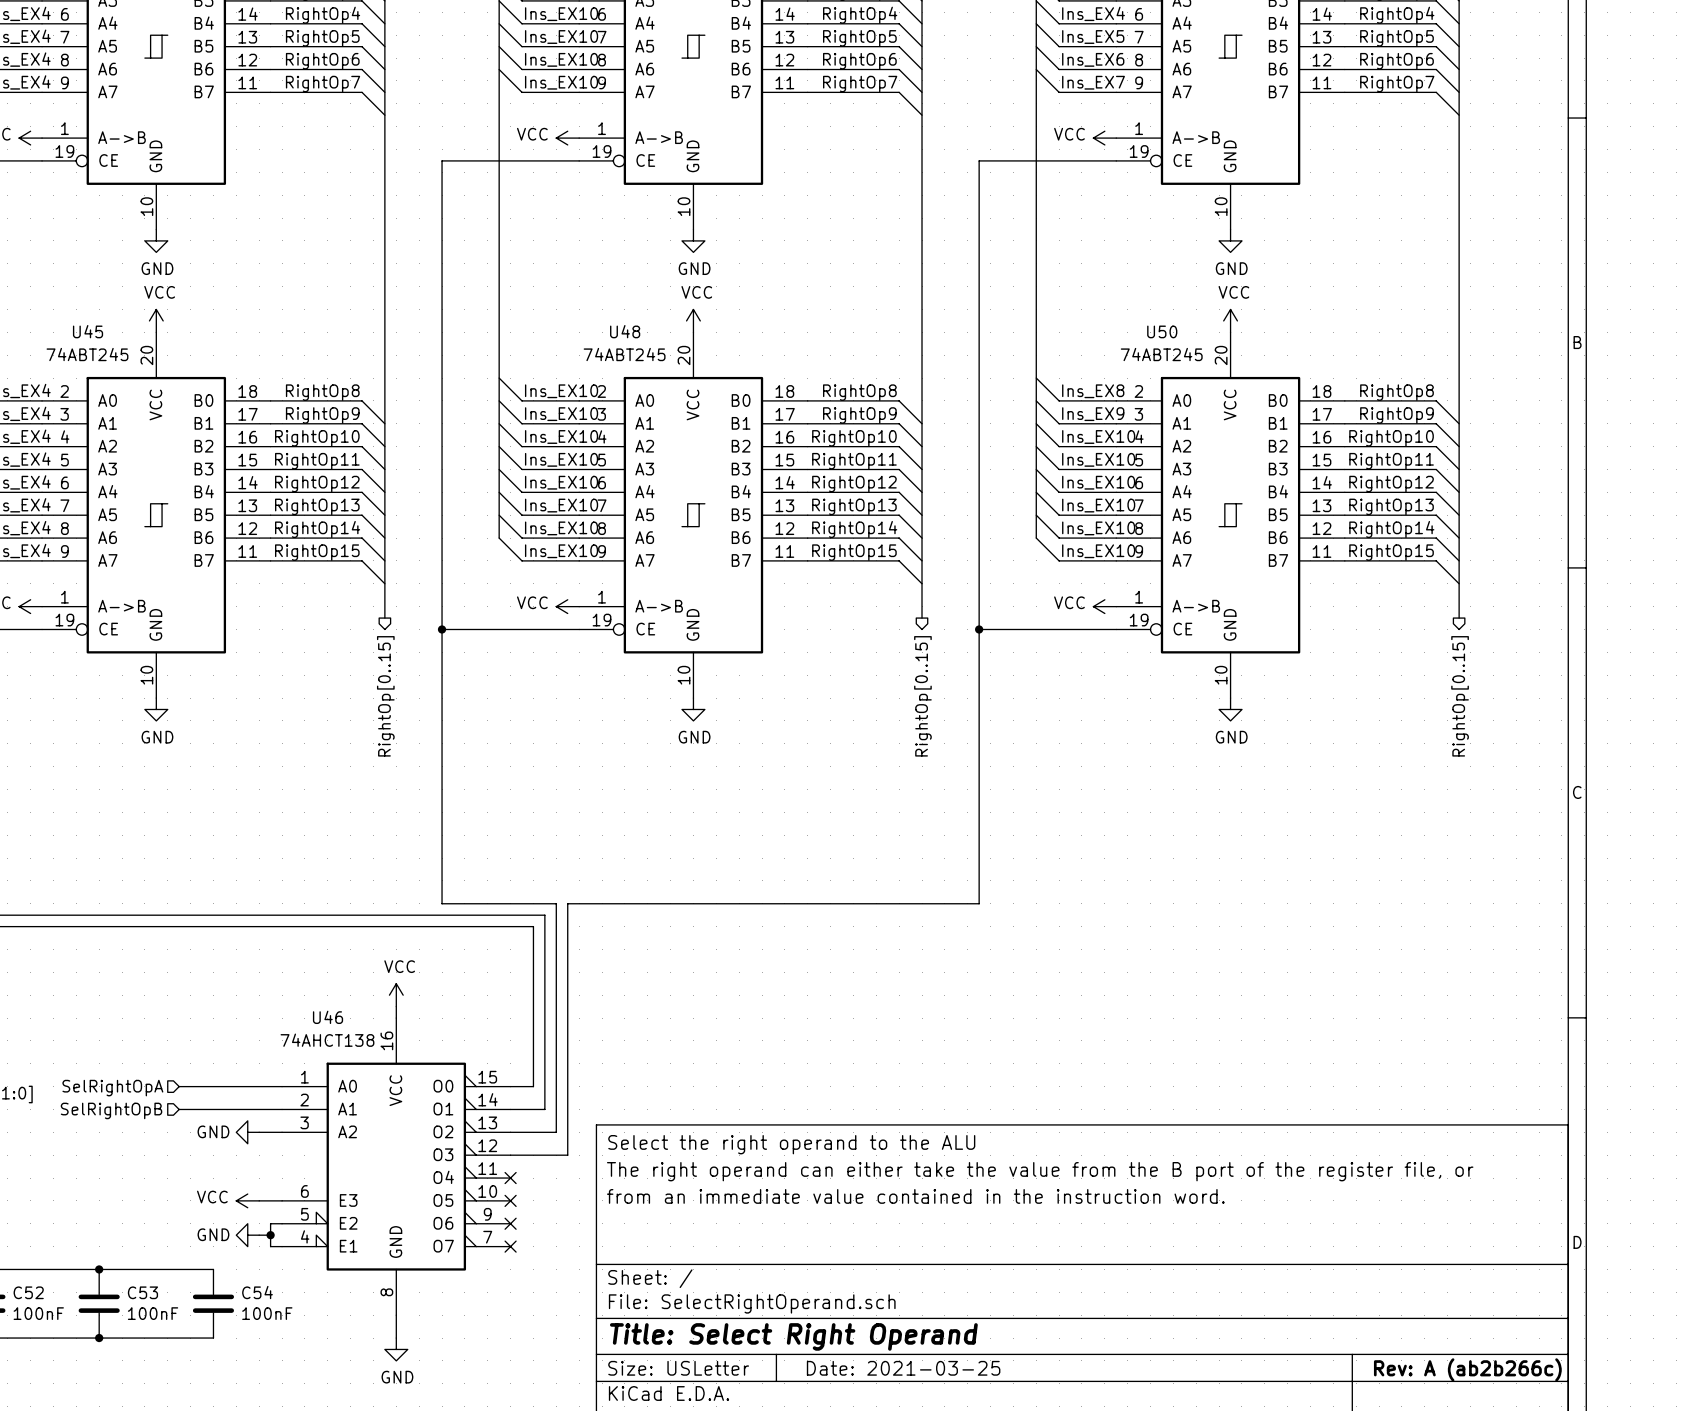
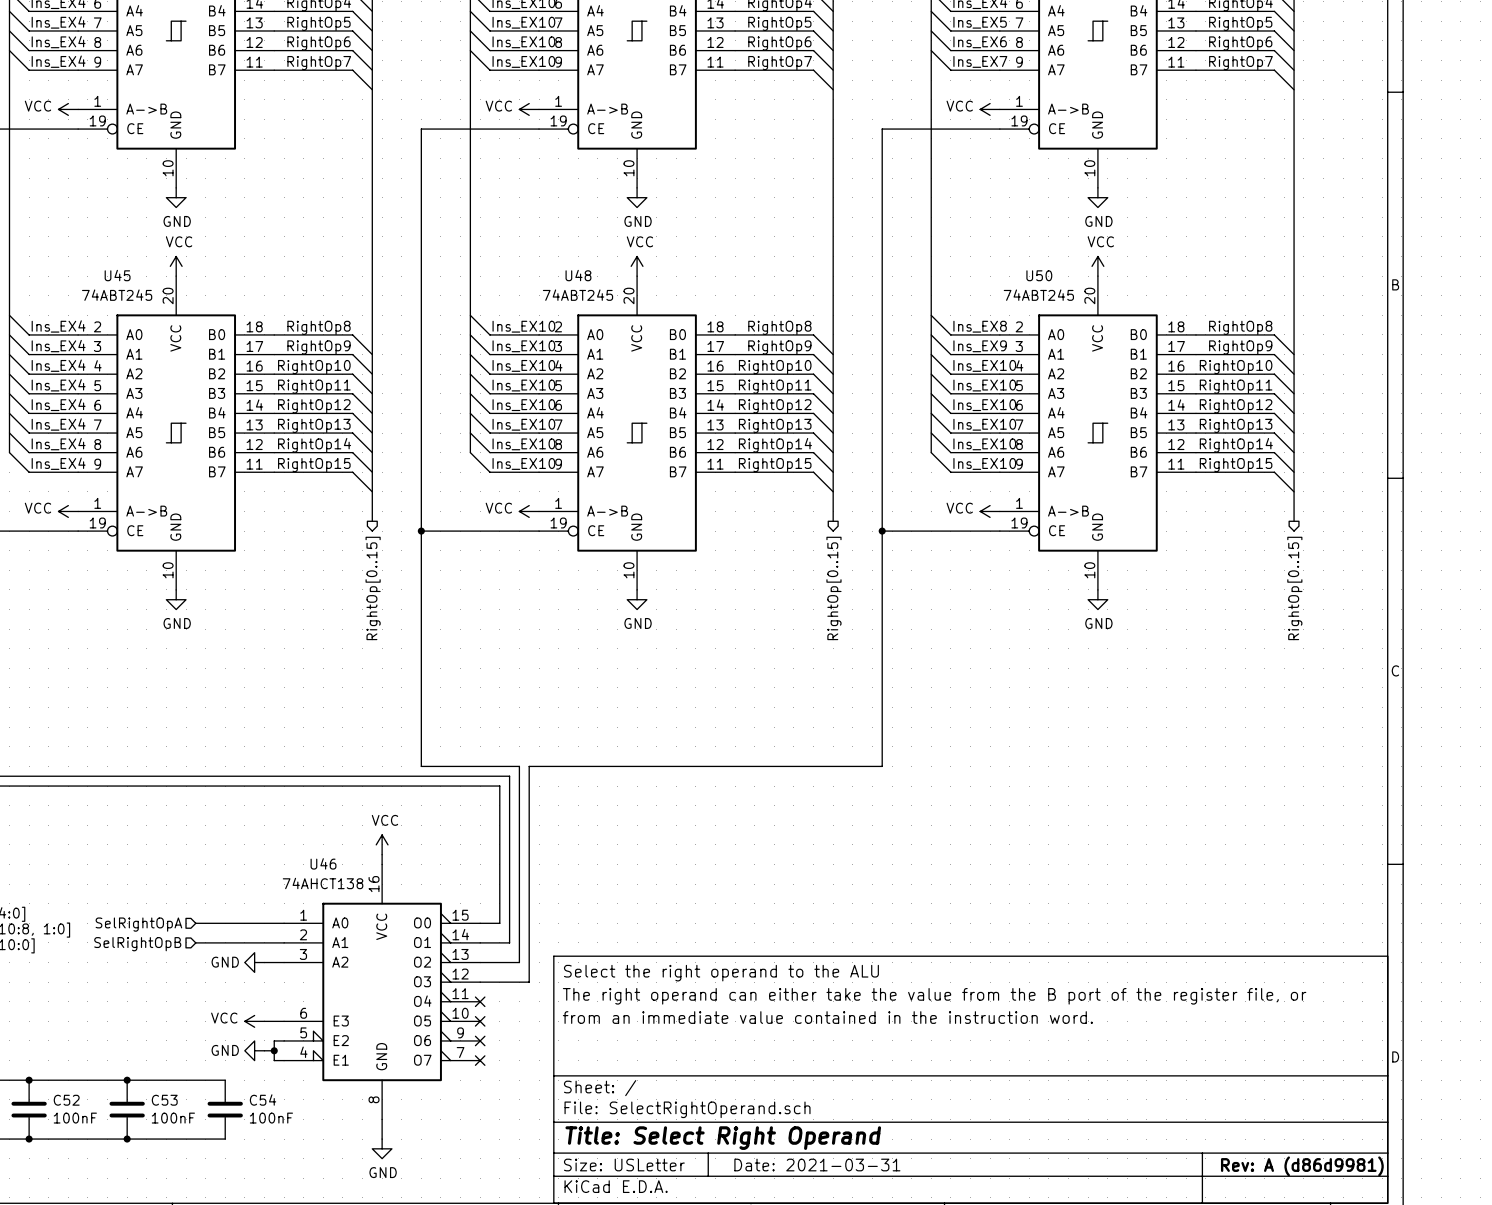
title block: Date: 2021-03-25 (903, 1368) -> Date: 2021-03-31 (817, 1165)
title block: Rev: A (ab2b266c) (1467, 1369) -> Rev: A (d86d9981) (1302, 1166)

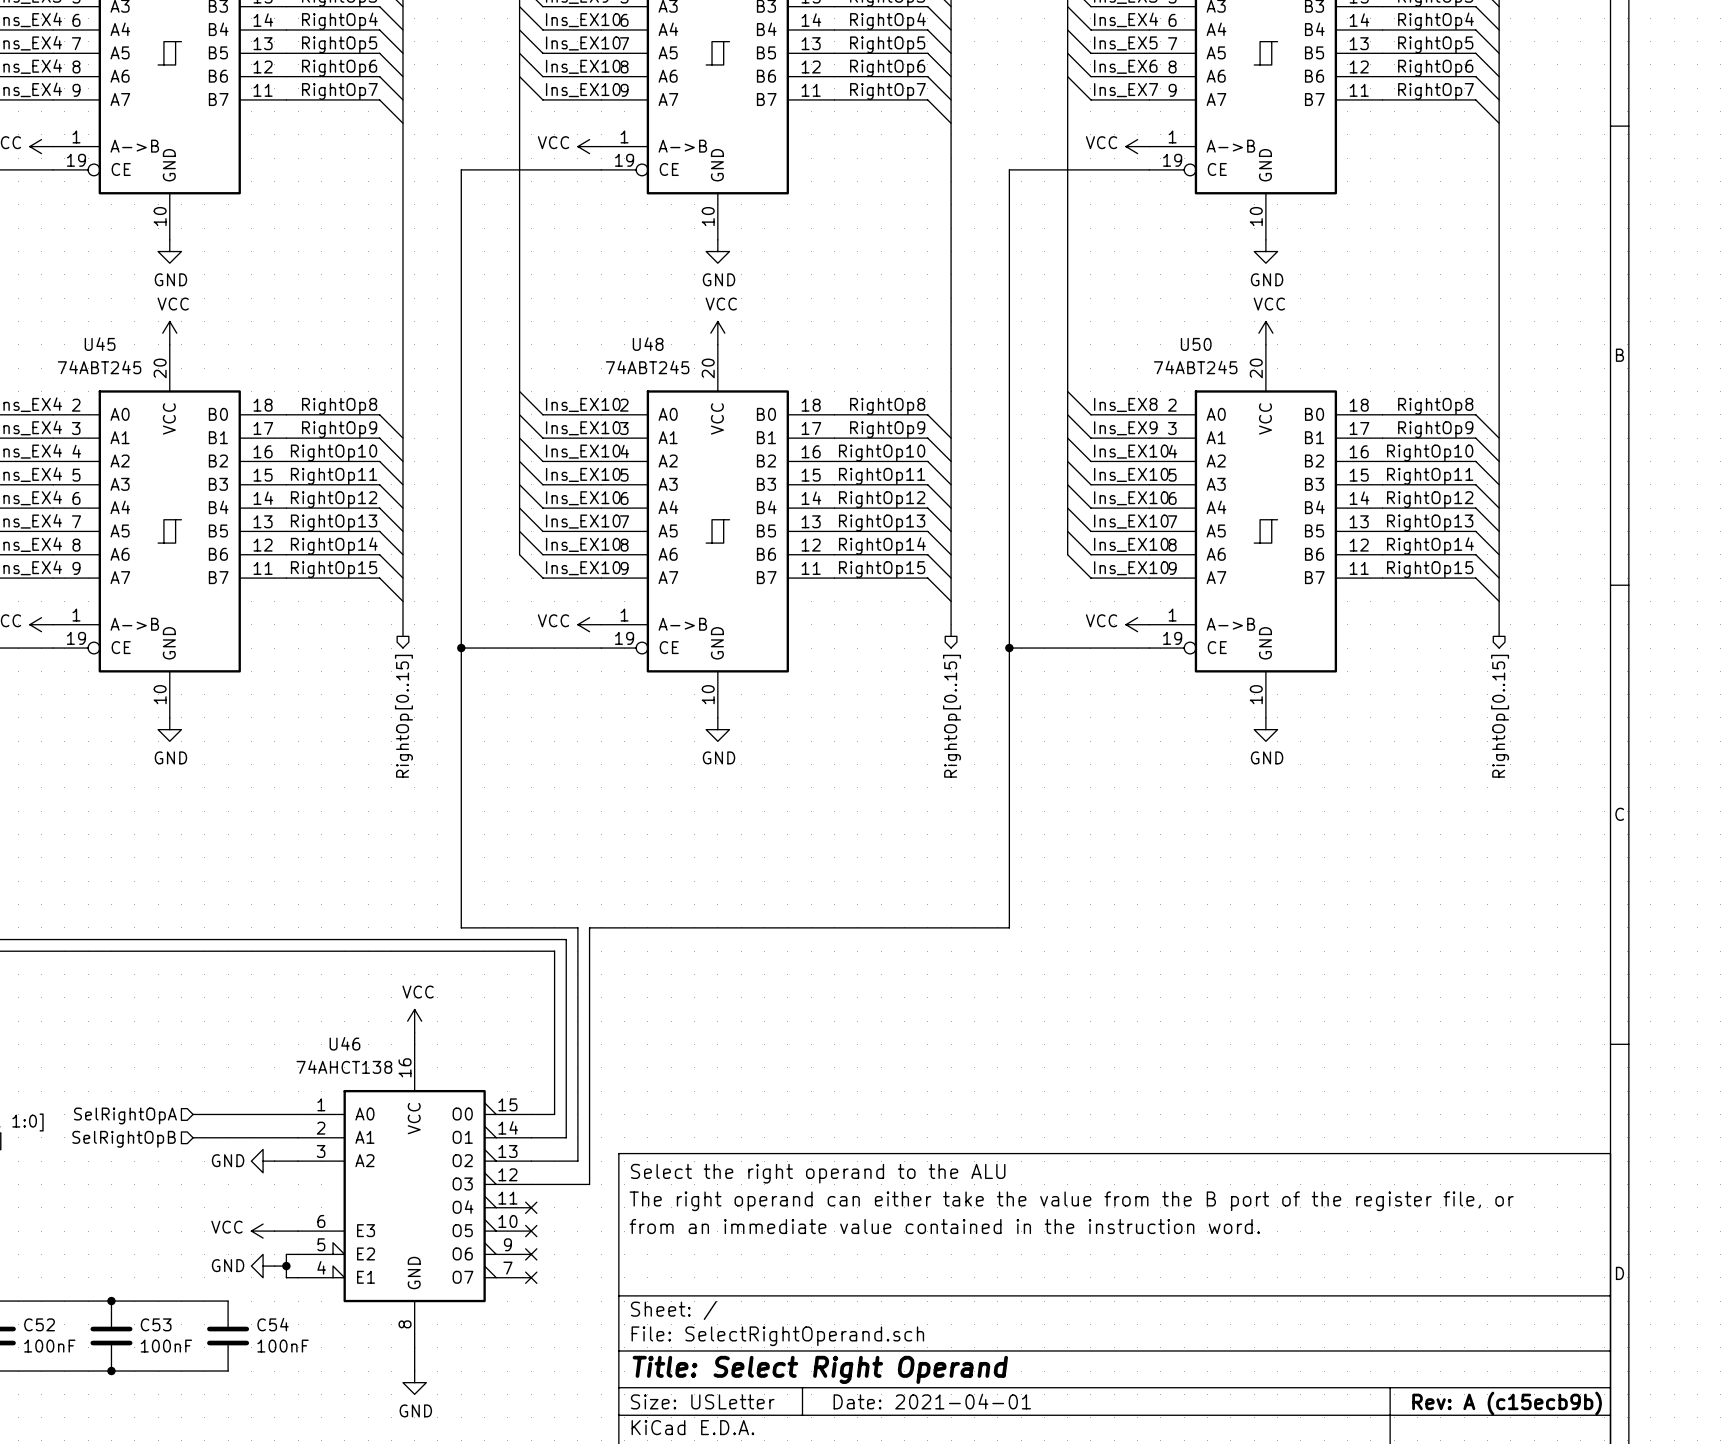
title block: Date: 2021-03-31 (817, 1165) -> Date: 2021-04-01 (932, 1401)
title block: Rev: A (d86d9981) (1302, 1166) -> Rev: A (c15ecb9b) (1507, 1403)

